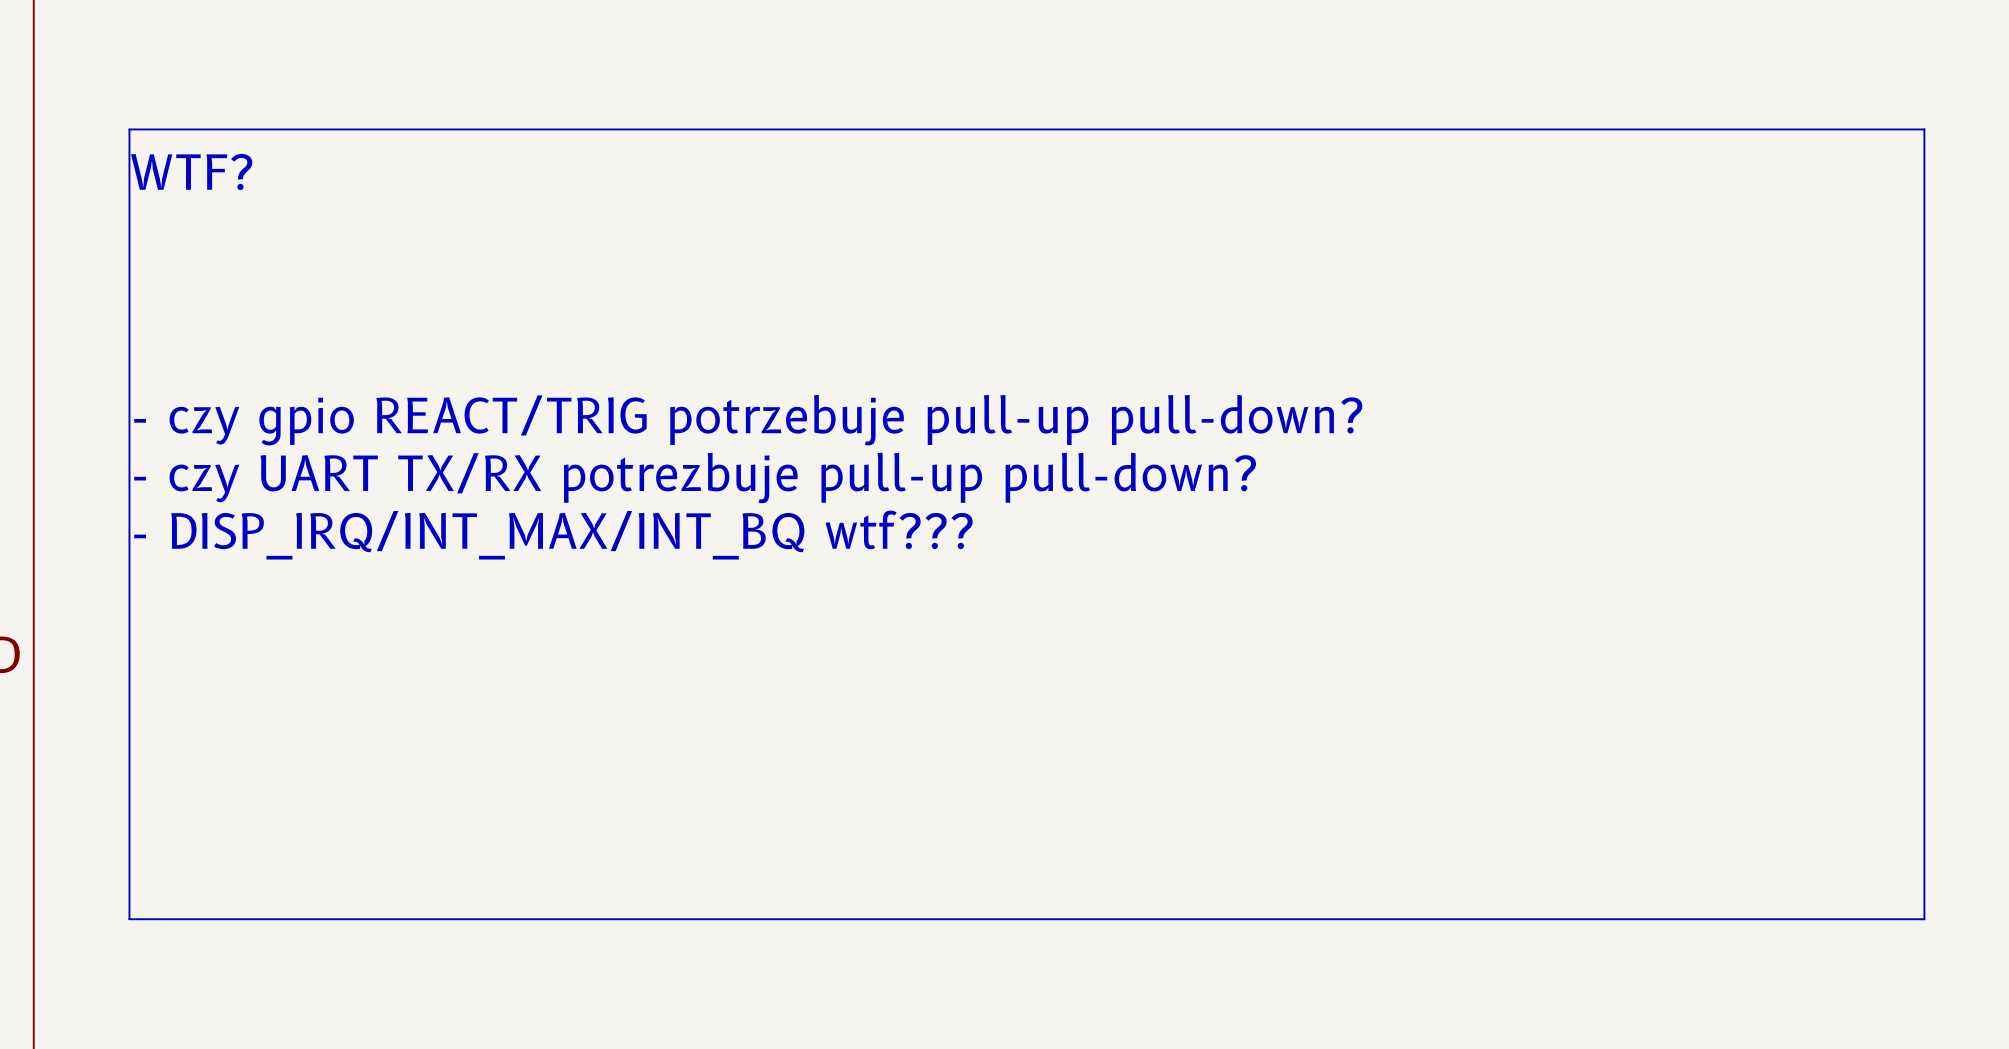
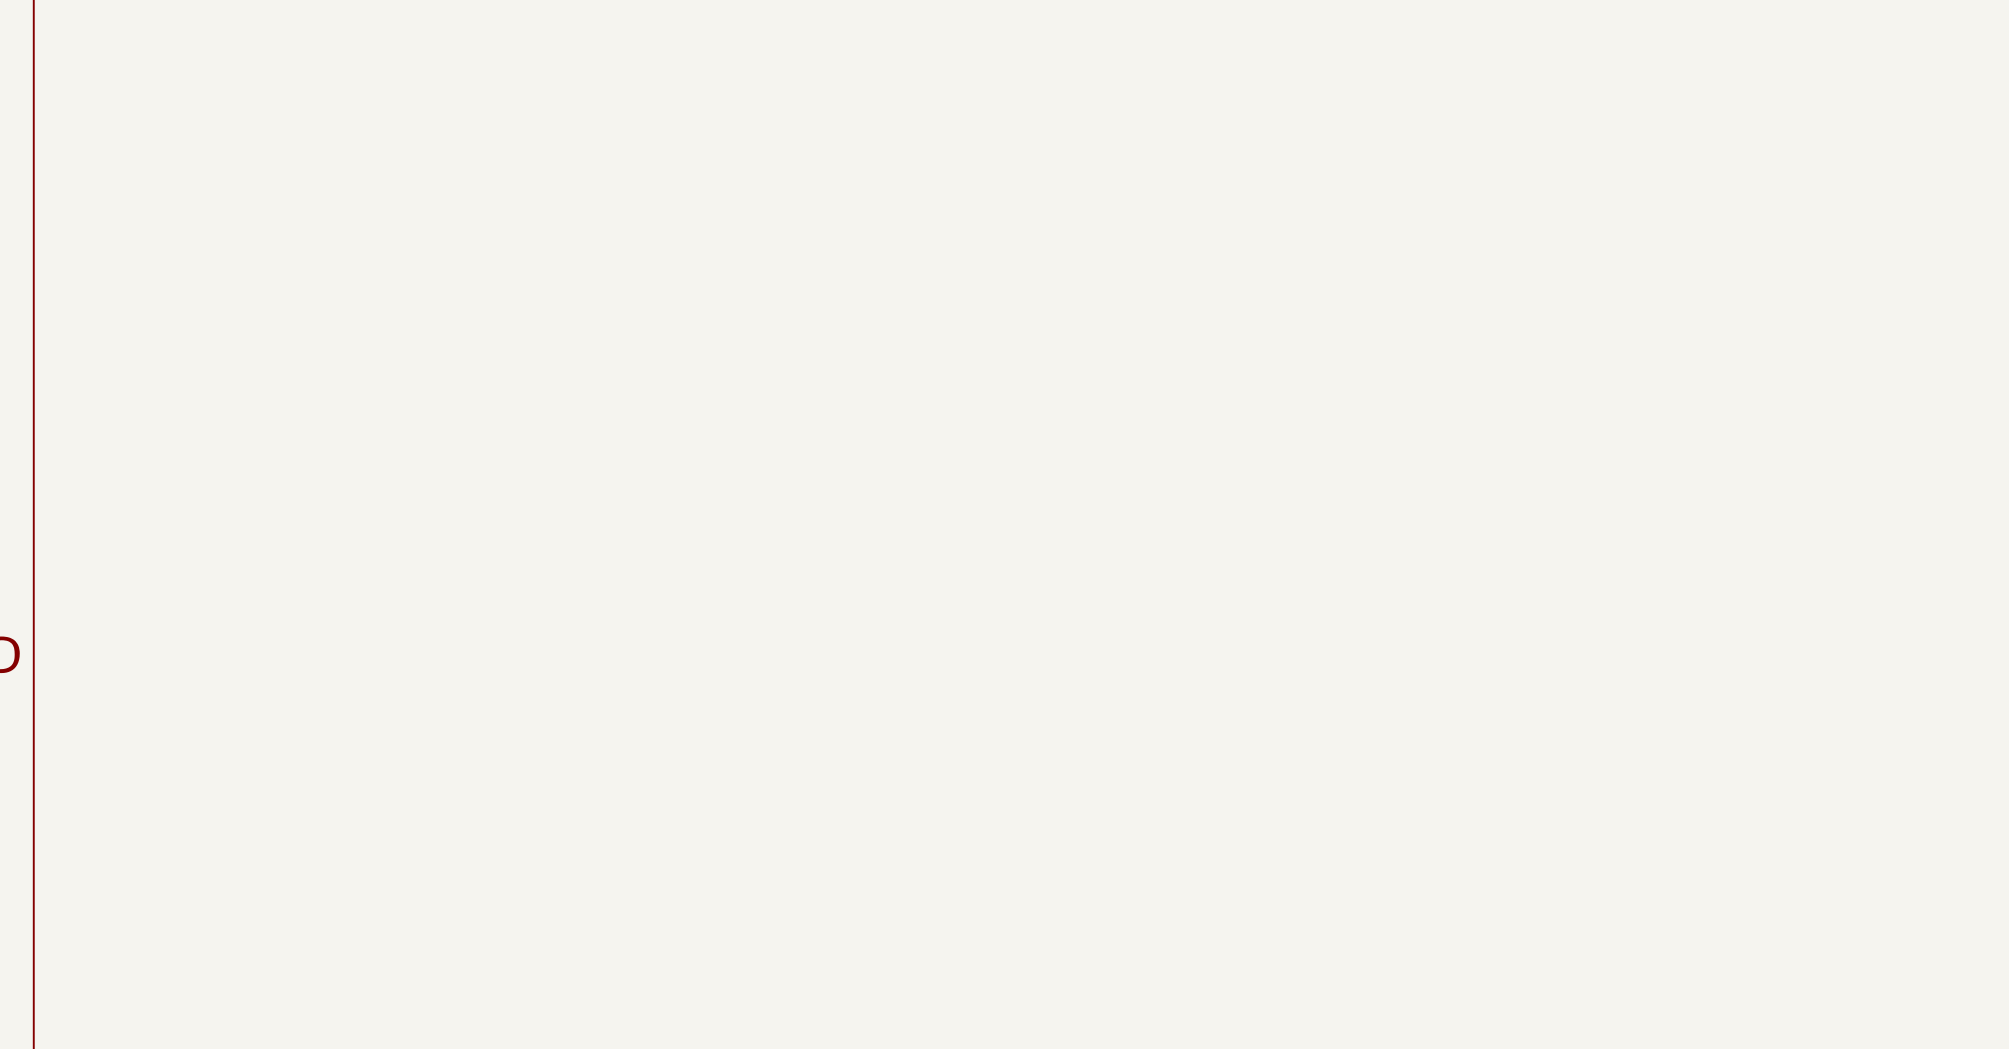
line: (129, 129) (1924, 129) (1924, 919) (129, 919) (129, 129) -> none
text: WTF? (191, 172) -> none
text: - czy gpio REACT/TRIG potrzebuje pull-up pull-down? (748, 420) -> none
text: - czy UART TX/RX potrezbuje pull-up pull-down? (695, 477) -> none
text: - DISP_IRQ/INT_MAX/INT_BQ wtf??? (553, 535) -> none

